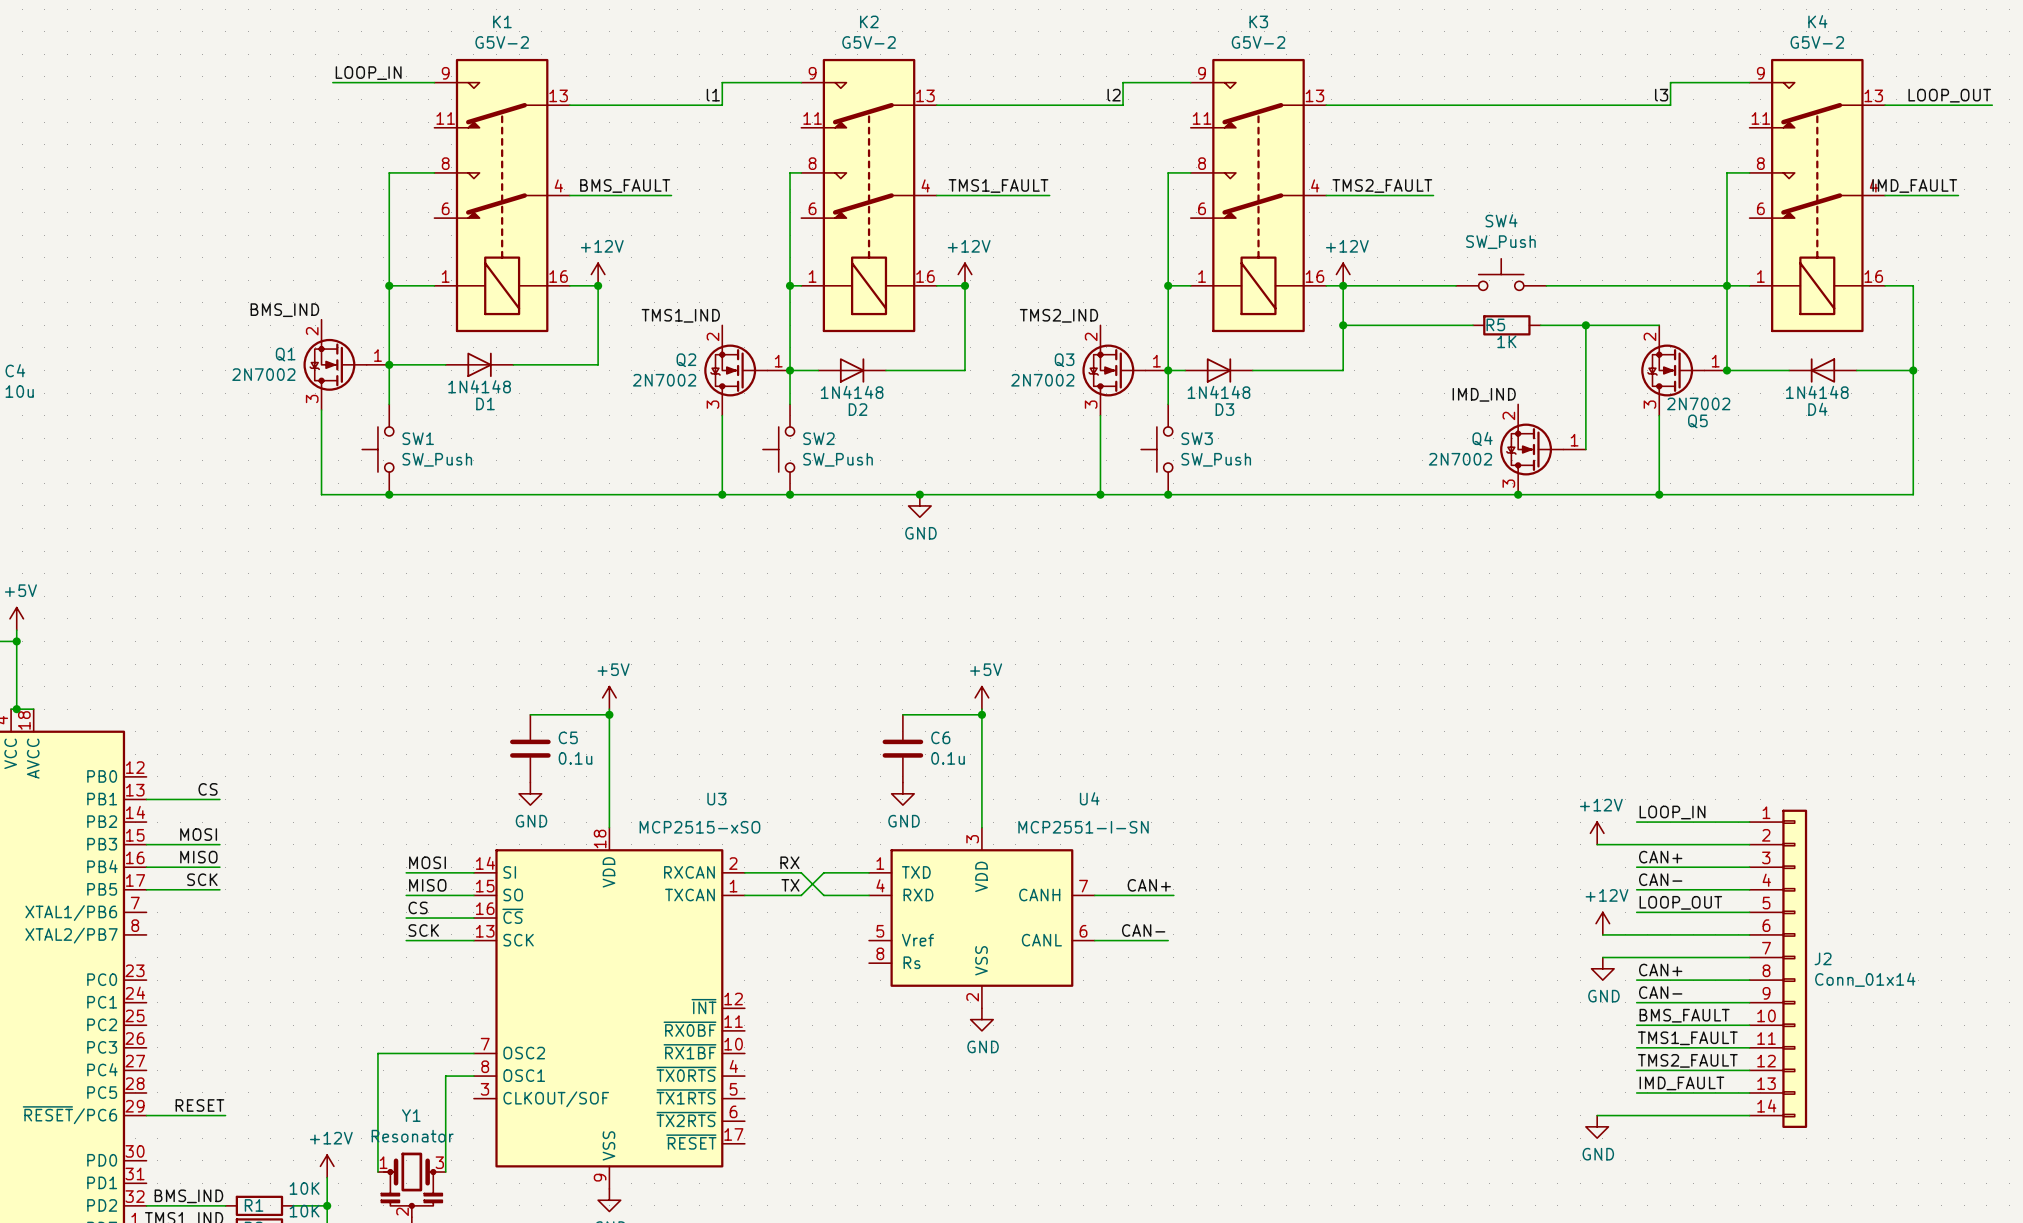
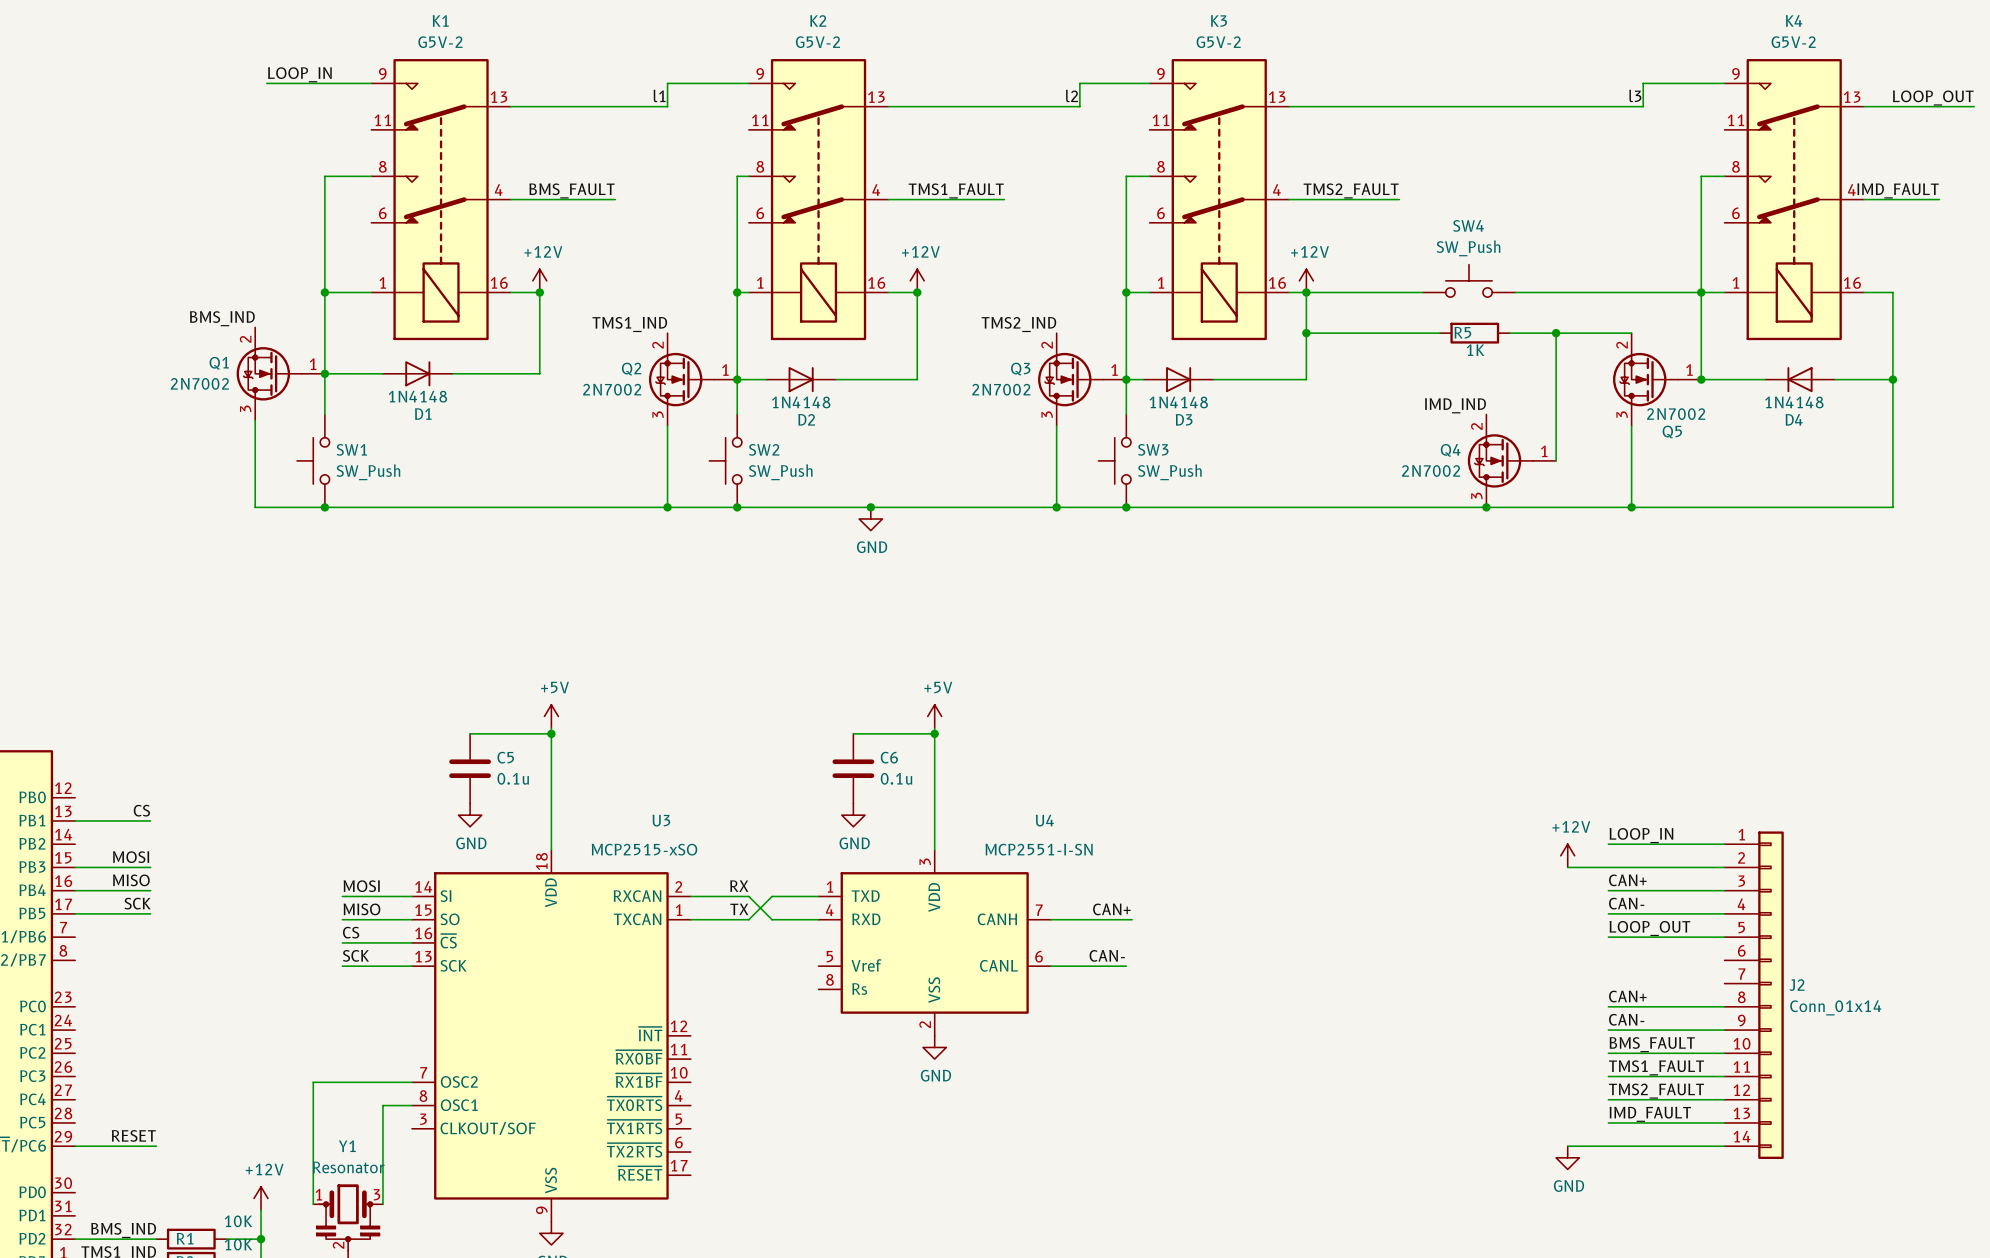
power symbol: +12V (1602, 923) -> none
wire: (1602, 934) (1749, 934) -> none
wire: (1602, 957) (1749, 957) -> none
power symbol: GND (1602, 968) -> none

